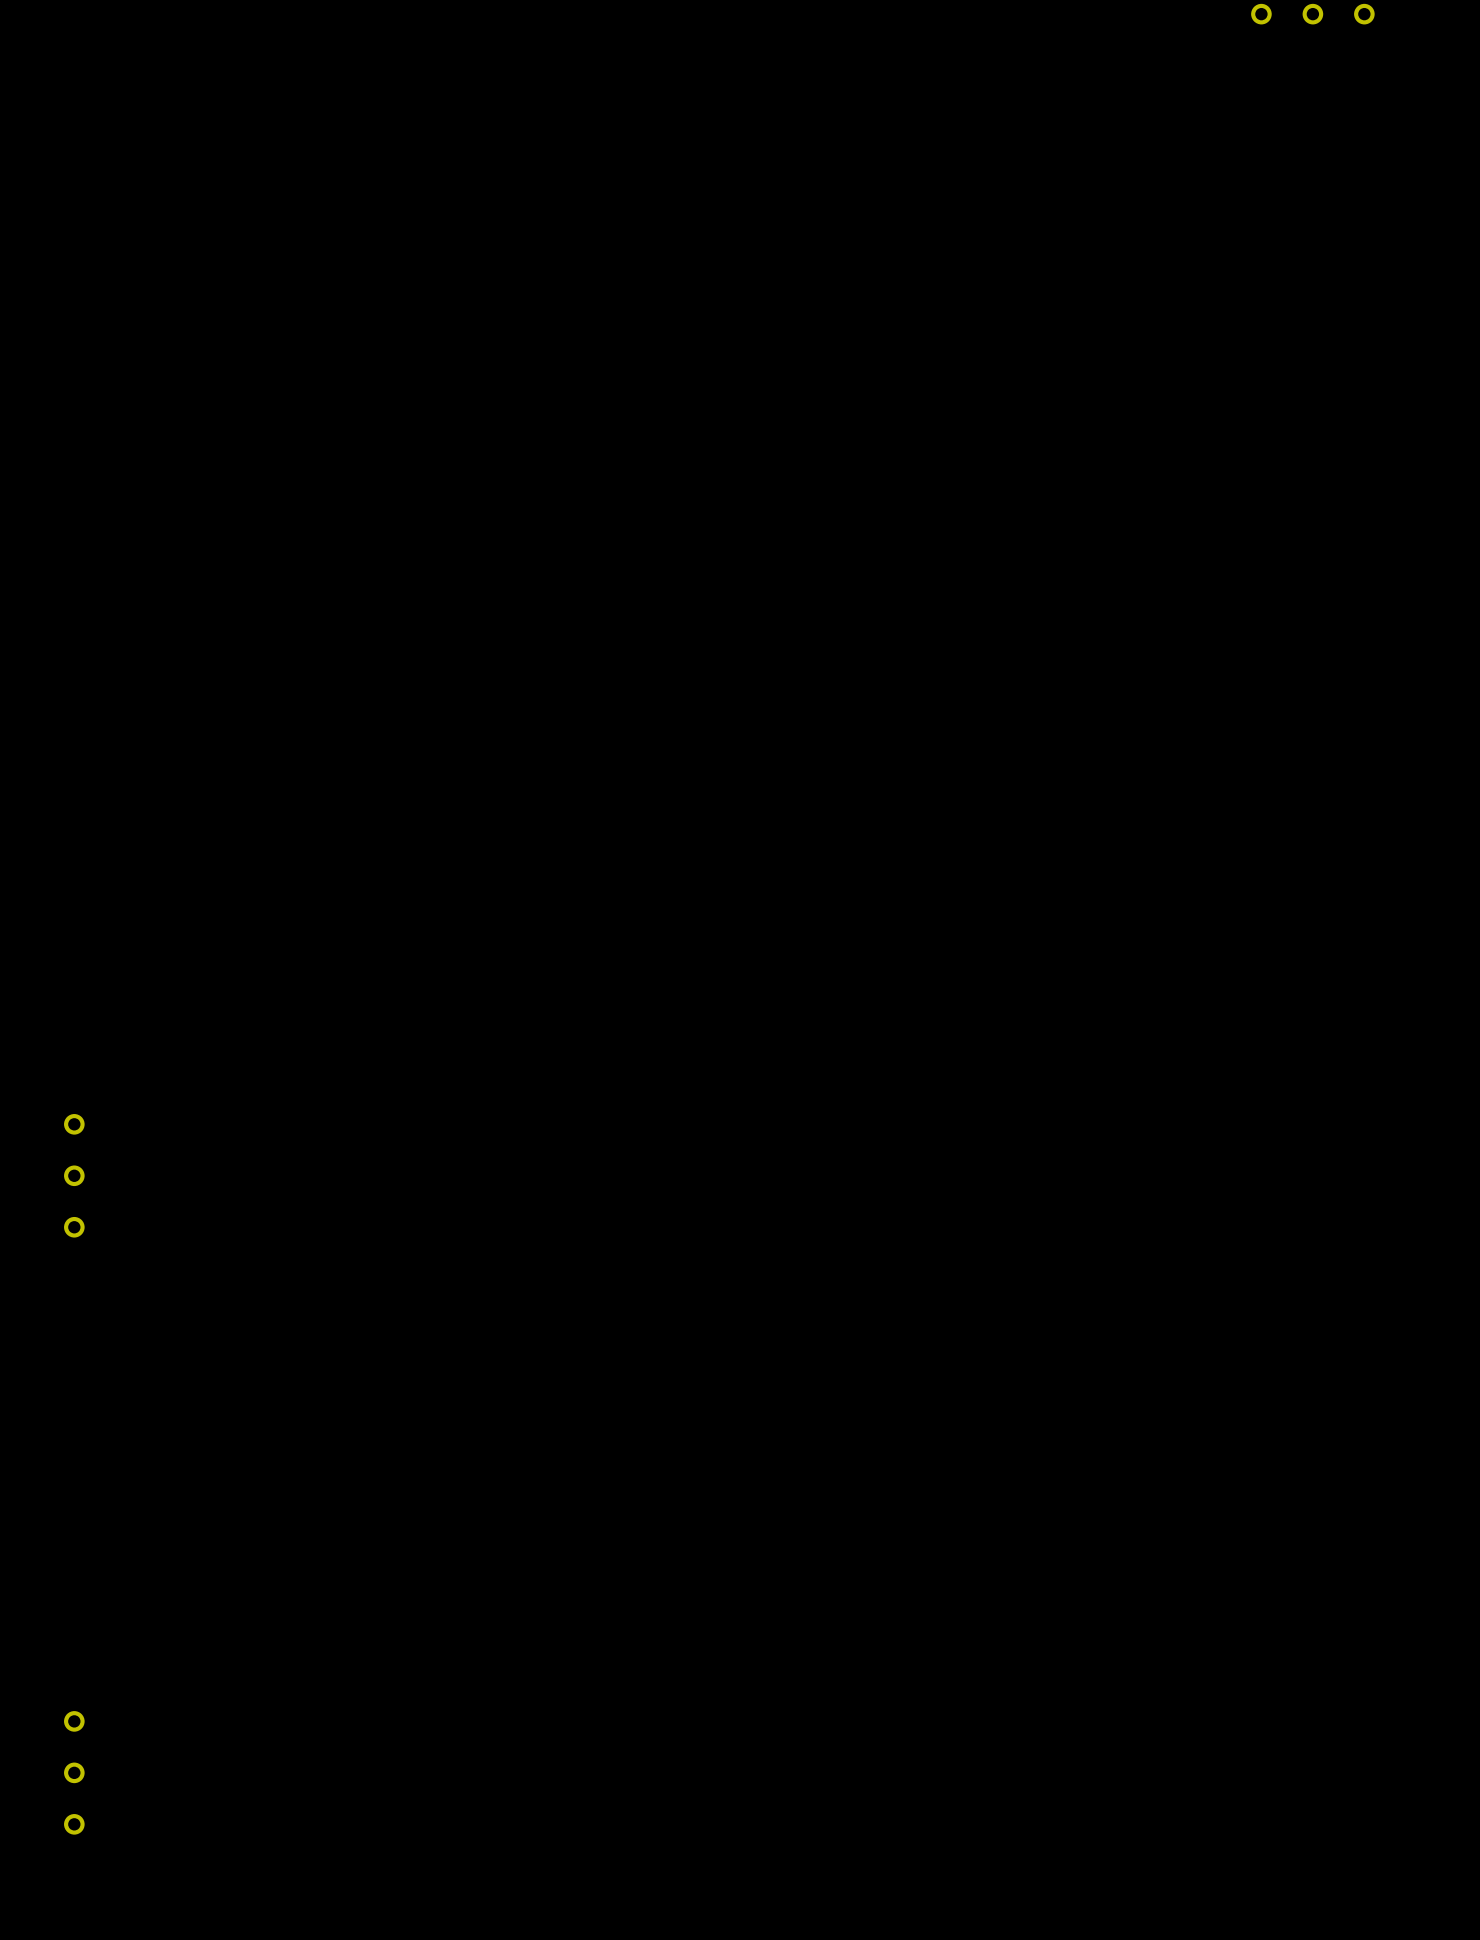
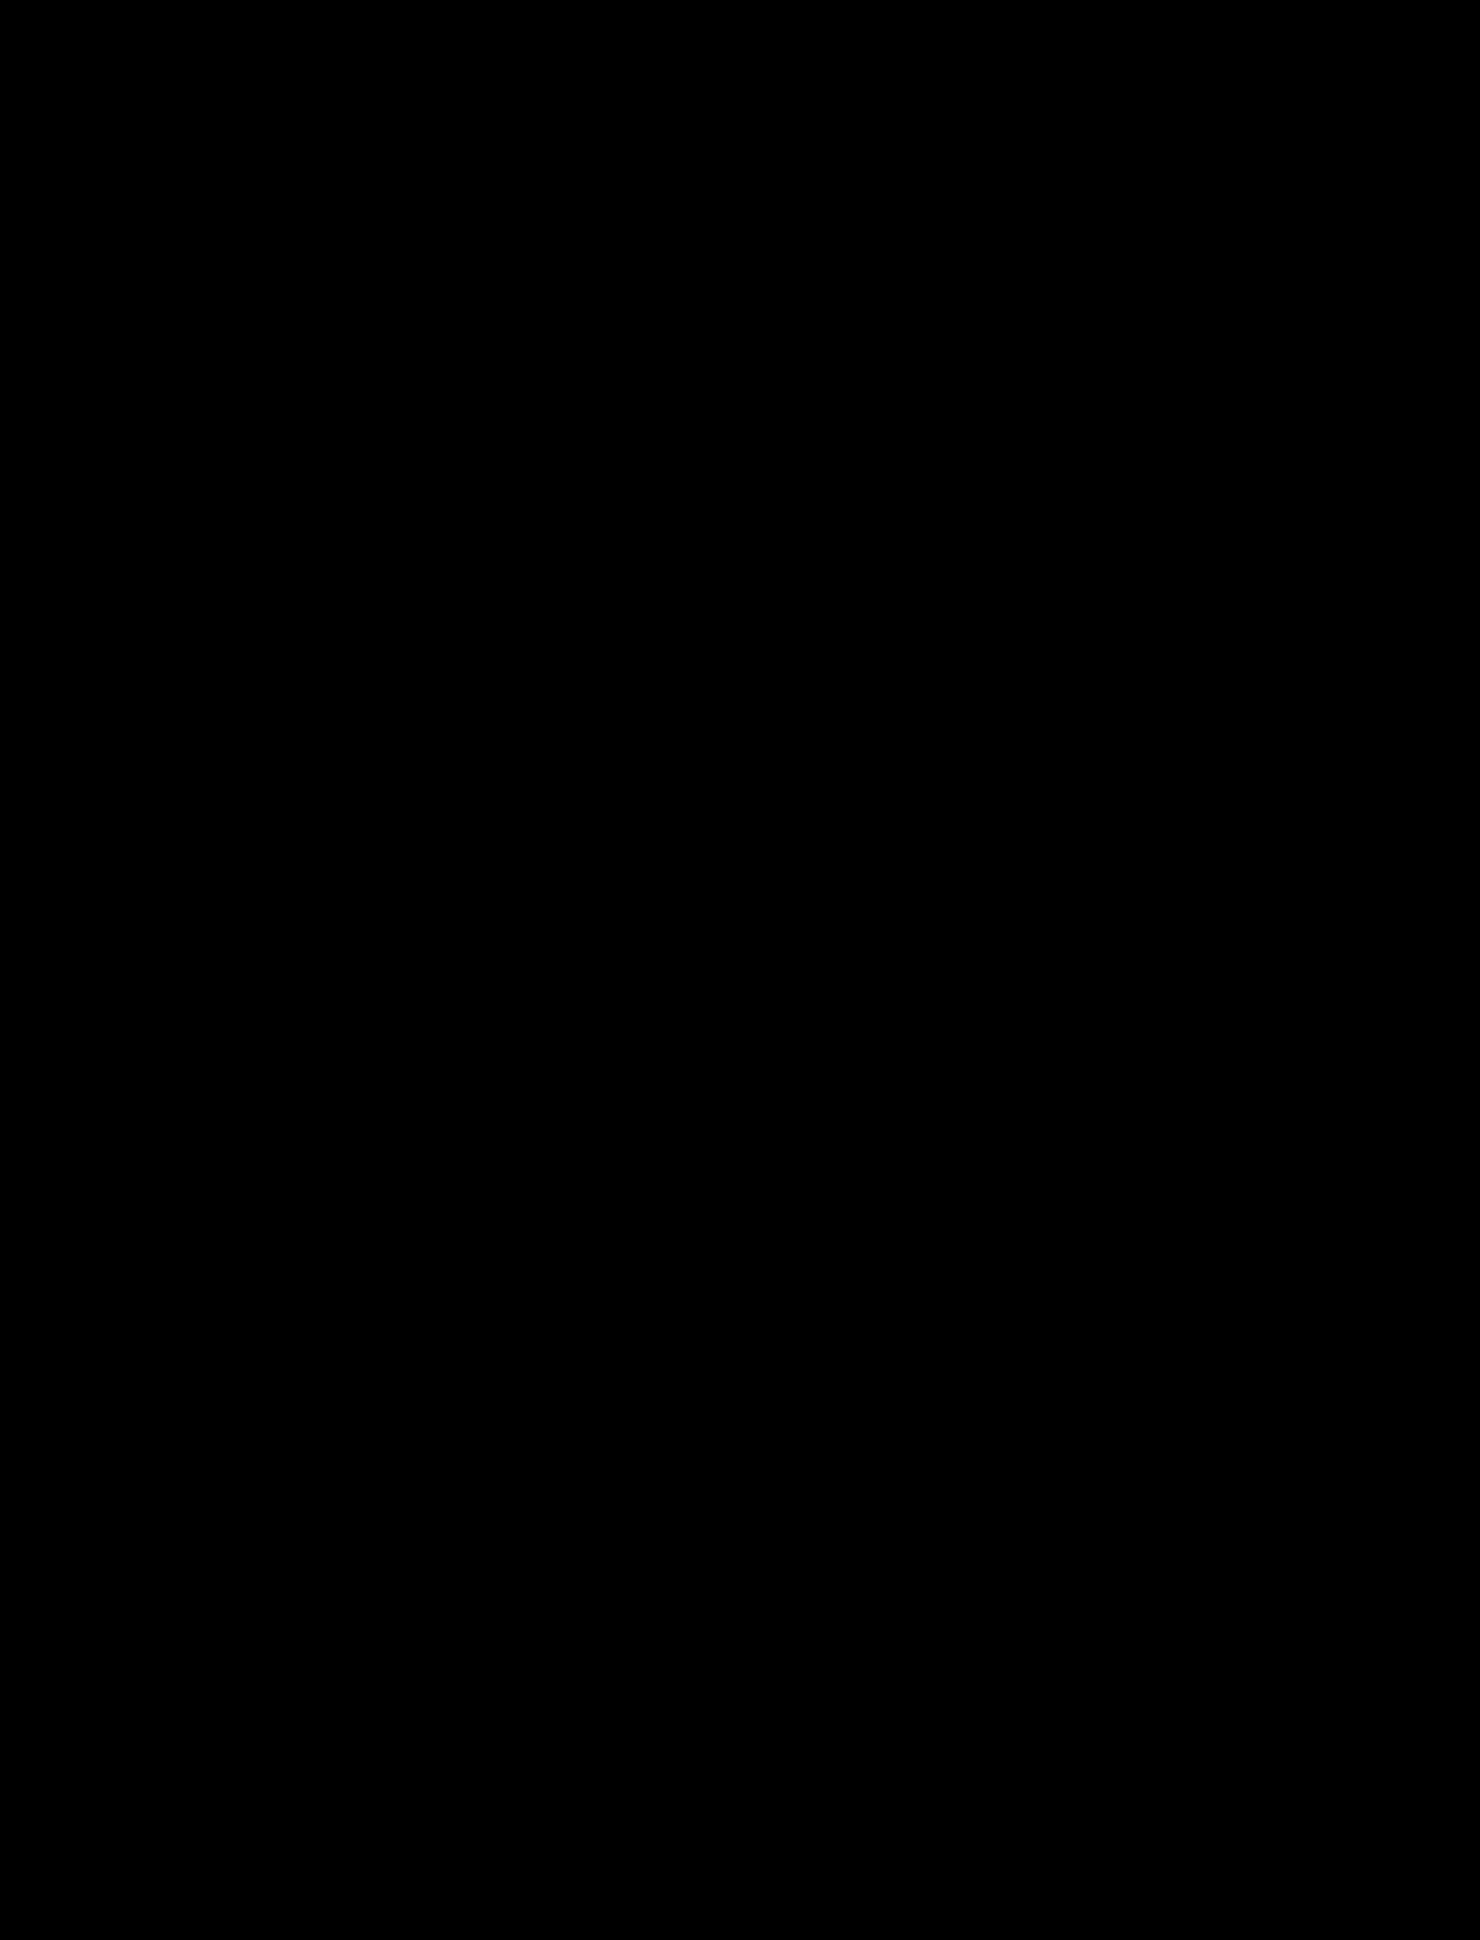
part: (1312, 14) -> none
part: (74, 1175) -> none
part: (74, 1772) -> none

